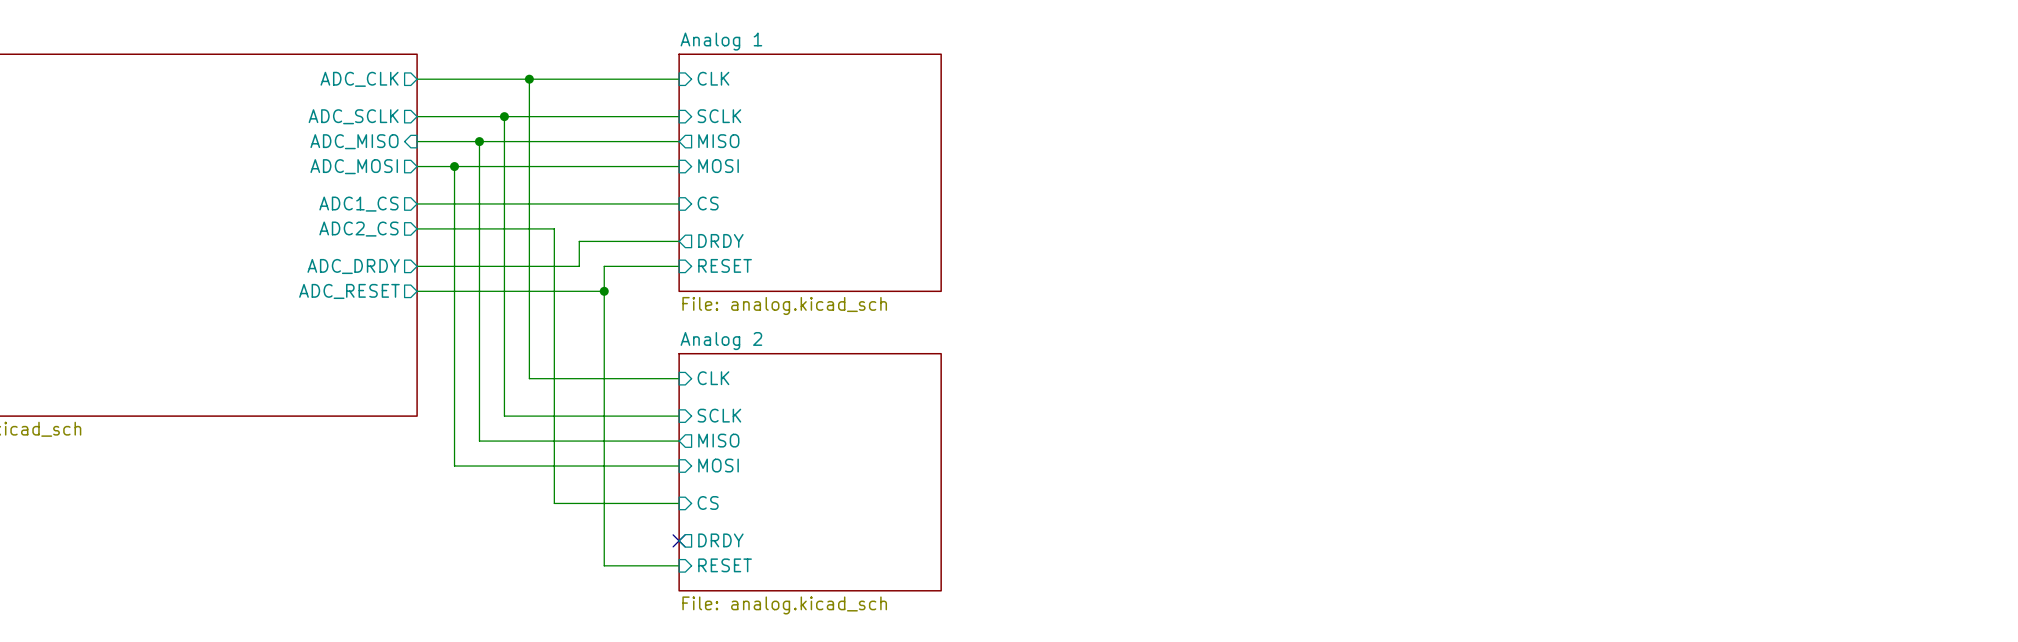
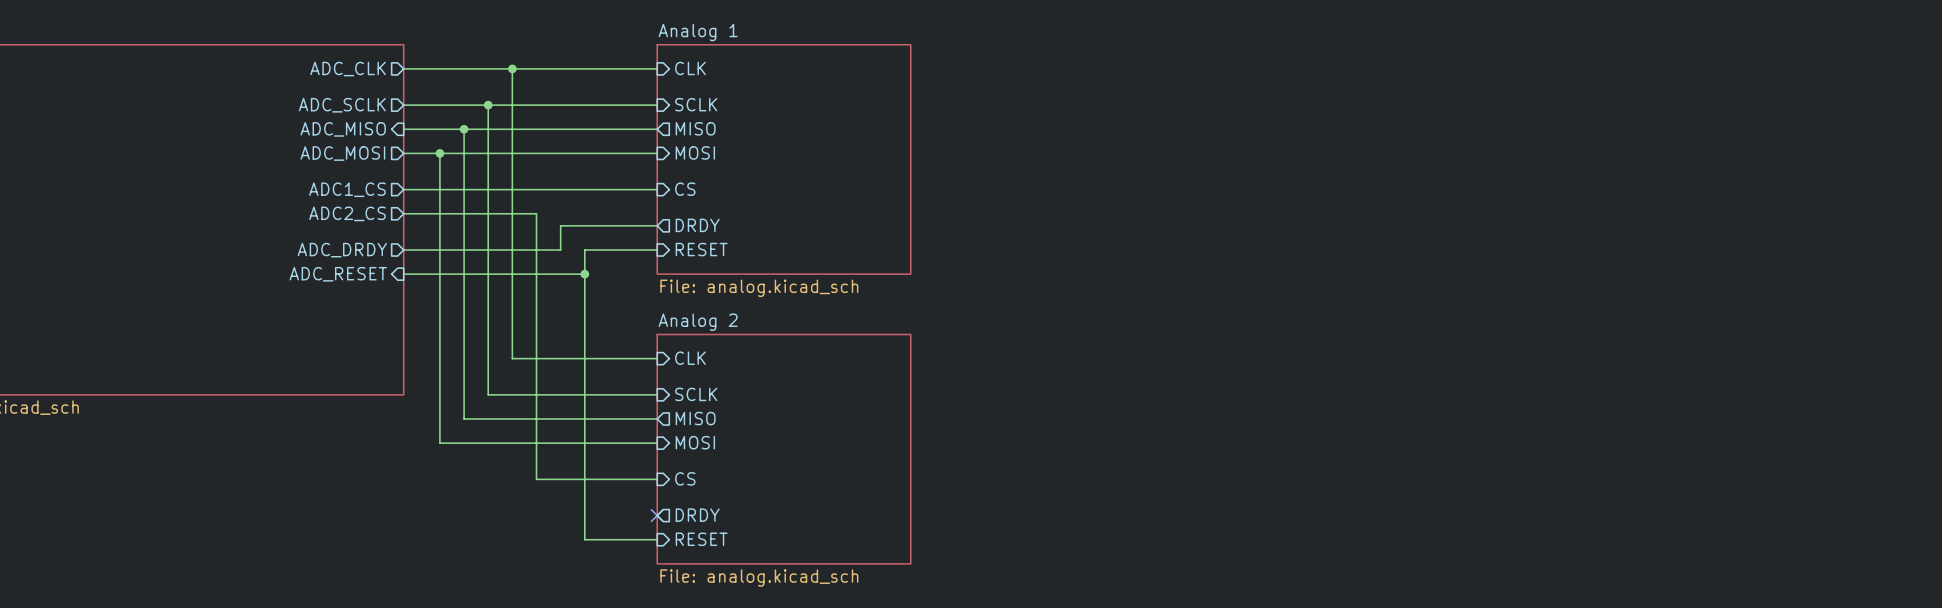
sheet pin shape: output (349, 291) -> input (338, 274)

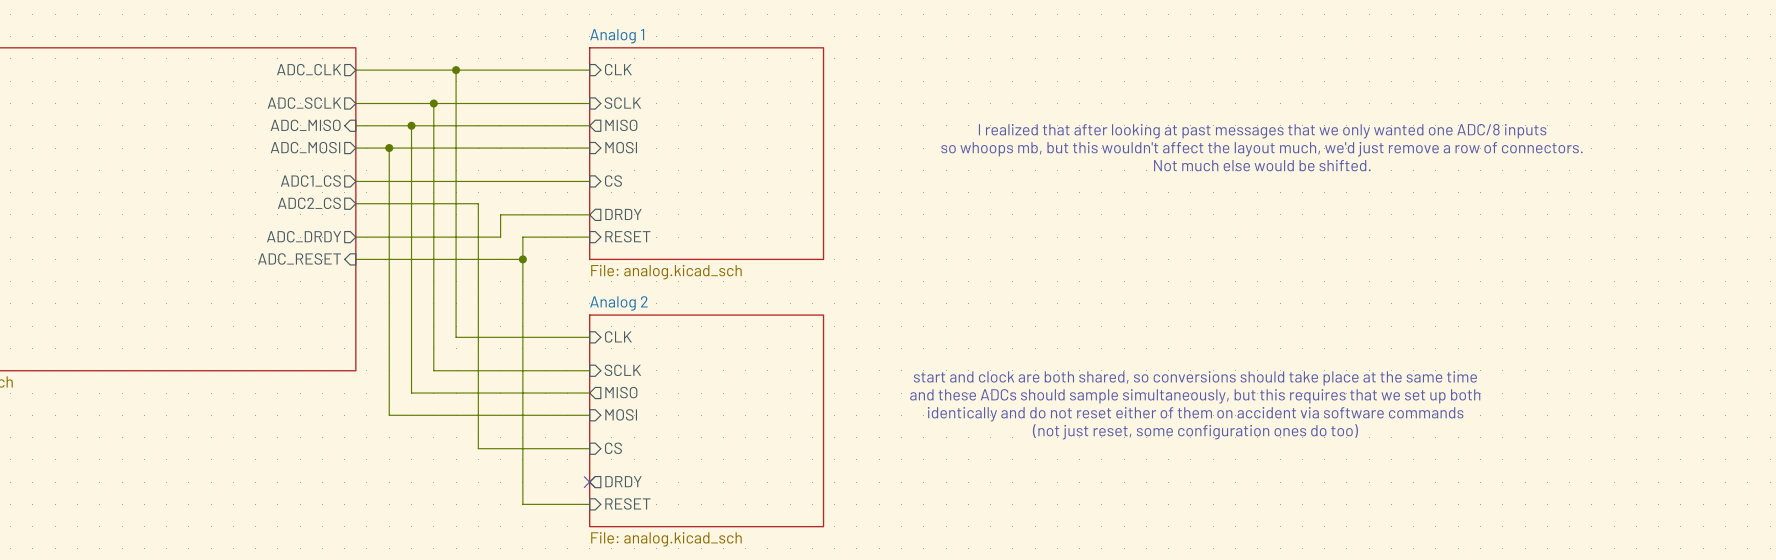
text: none -> I realized that after looking at past messages that we only wanted one ADC/8 inputs (1262, 131)
text: none -> so whoops mb, but this wouldn't affect the layout much, we'd just remove a row of connectors. (1262, 149)
text: none -> Not much else would be shifted. (1262, 165)
text: none -> start and clock are both shared, so conversions should take place at the same time (1195, 378)
text: none -> and these ADCs should sample simultaneously, but this requires that we set up both (1195, 396)
text: none -> identically and do not reset either of them on accident via software commands (1195, 414)
text: none -> (not just reset, some configuration ones do too) (1195, 431)

